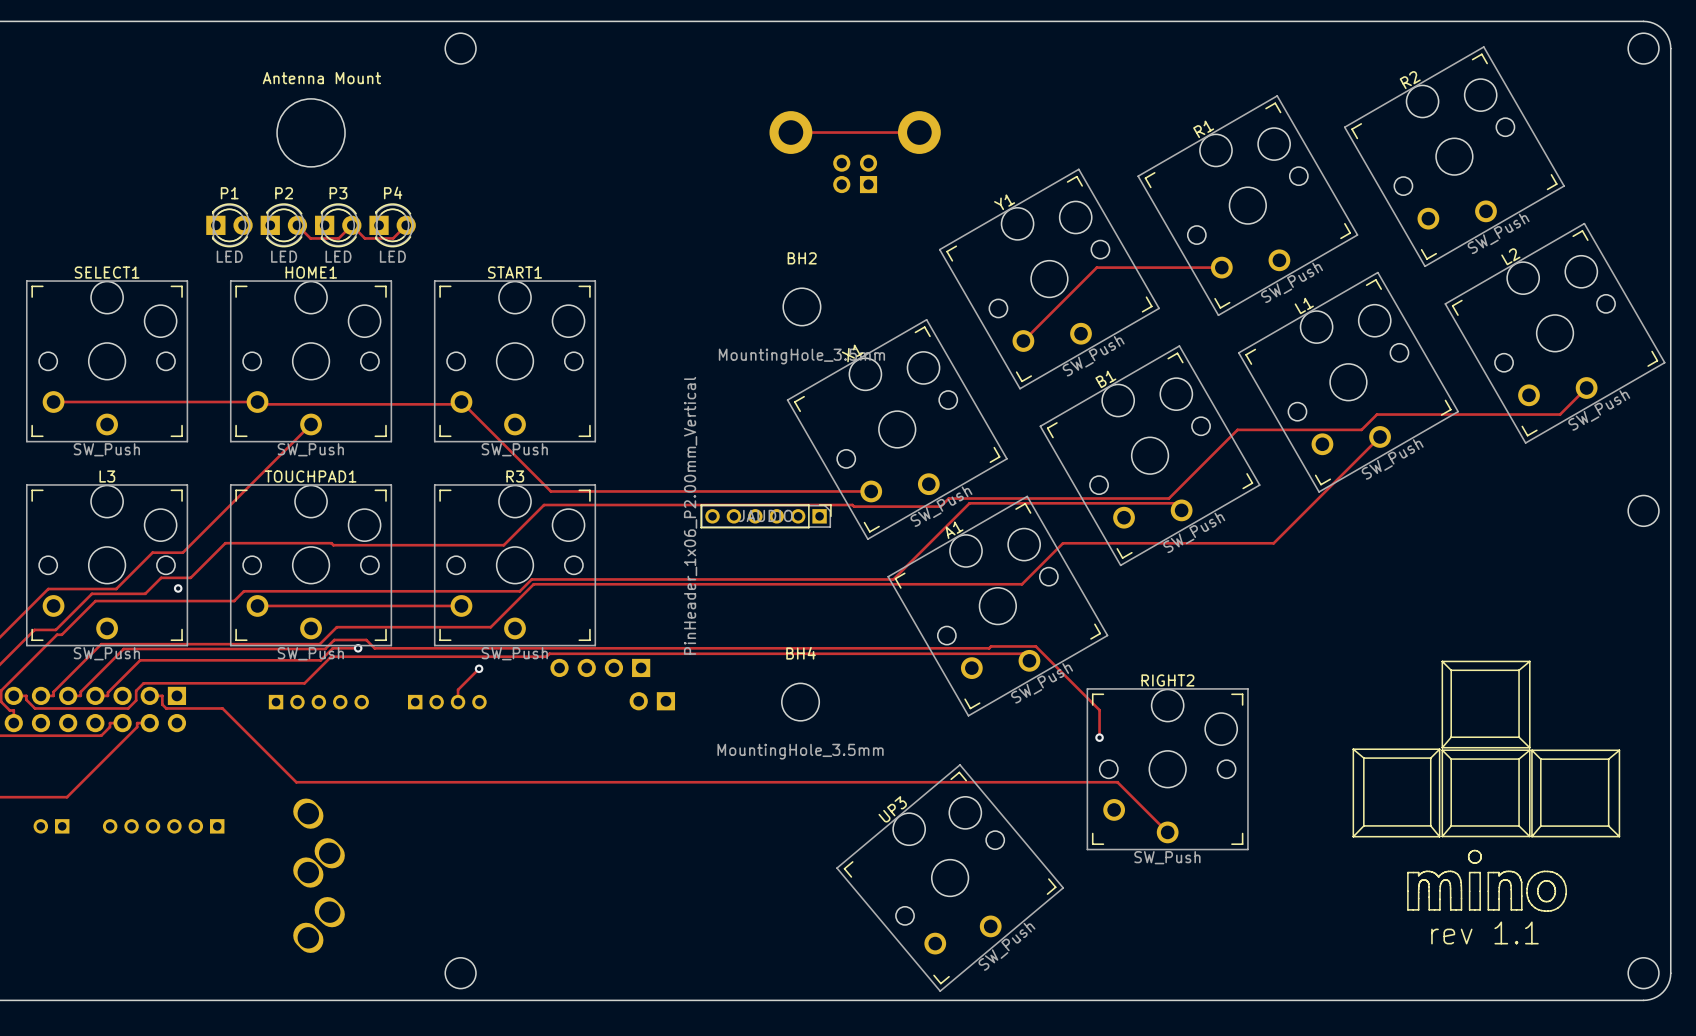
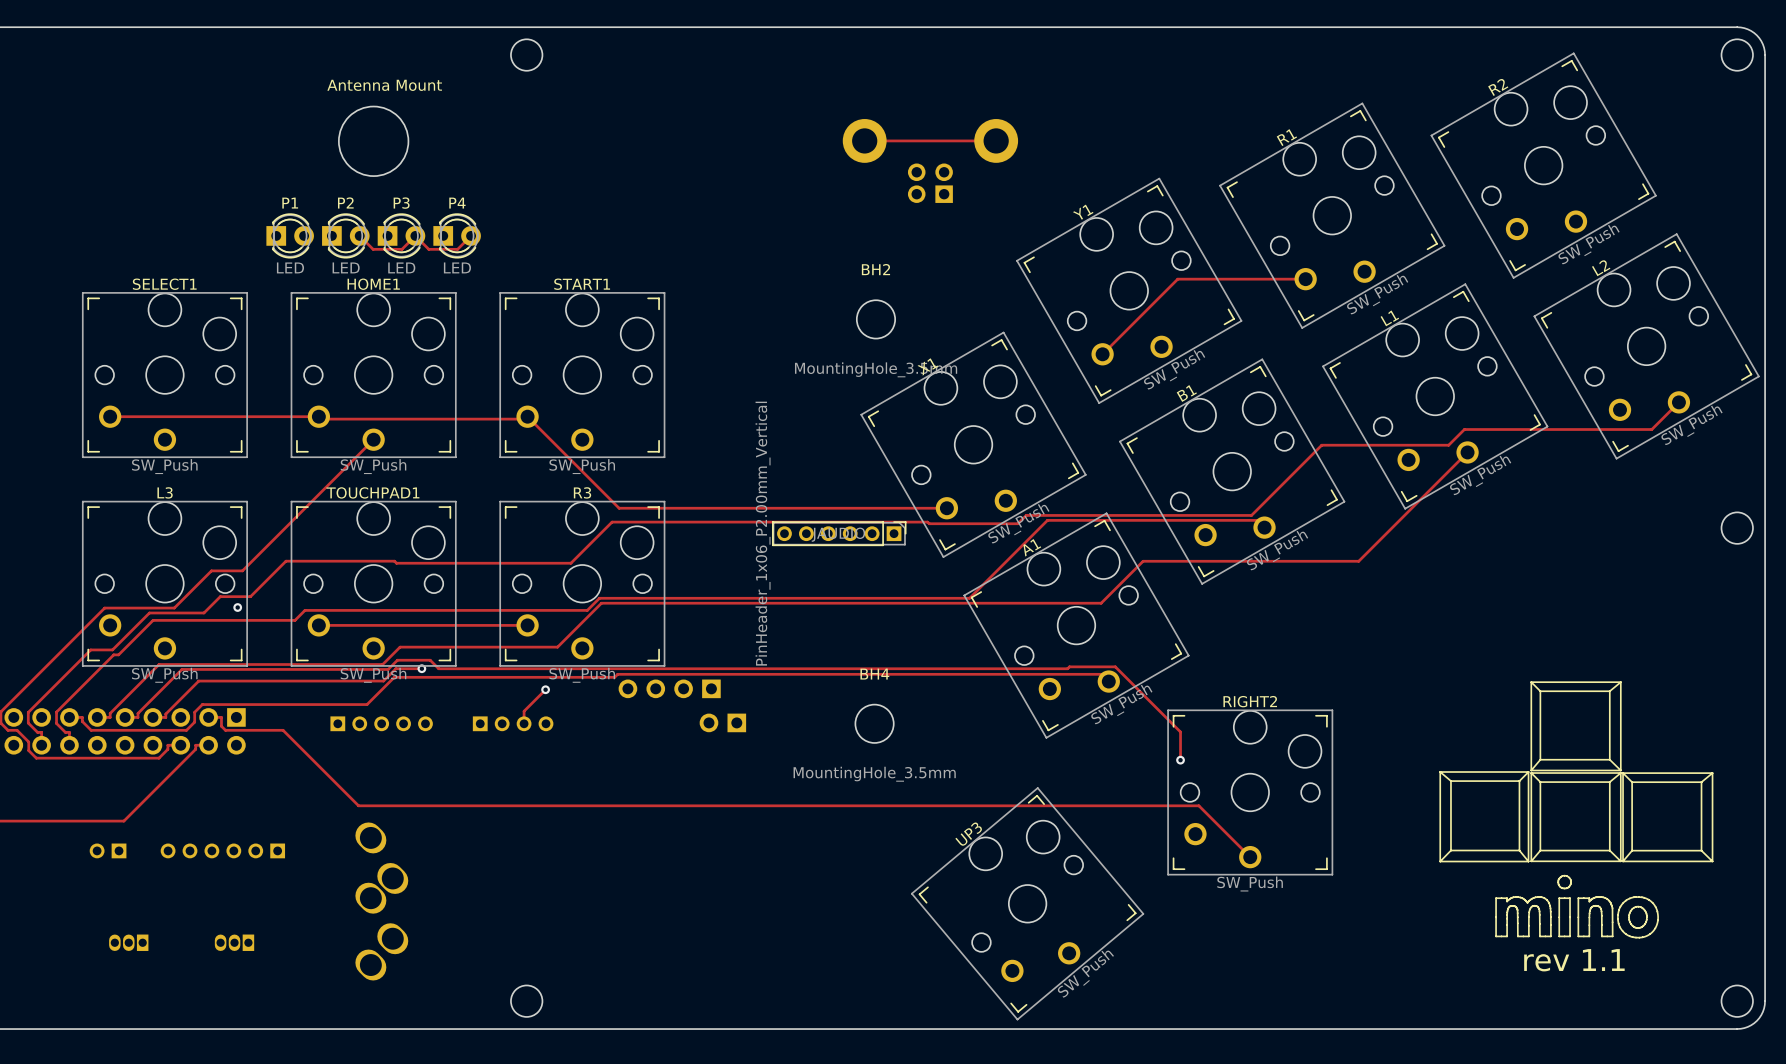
part: none -> (128, 942)
part: none -> (234, 942)

